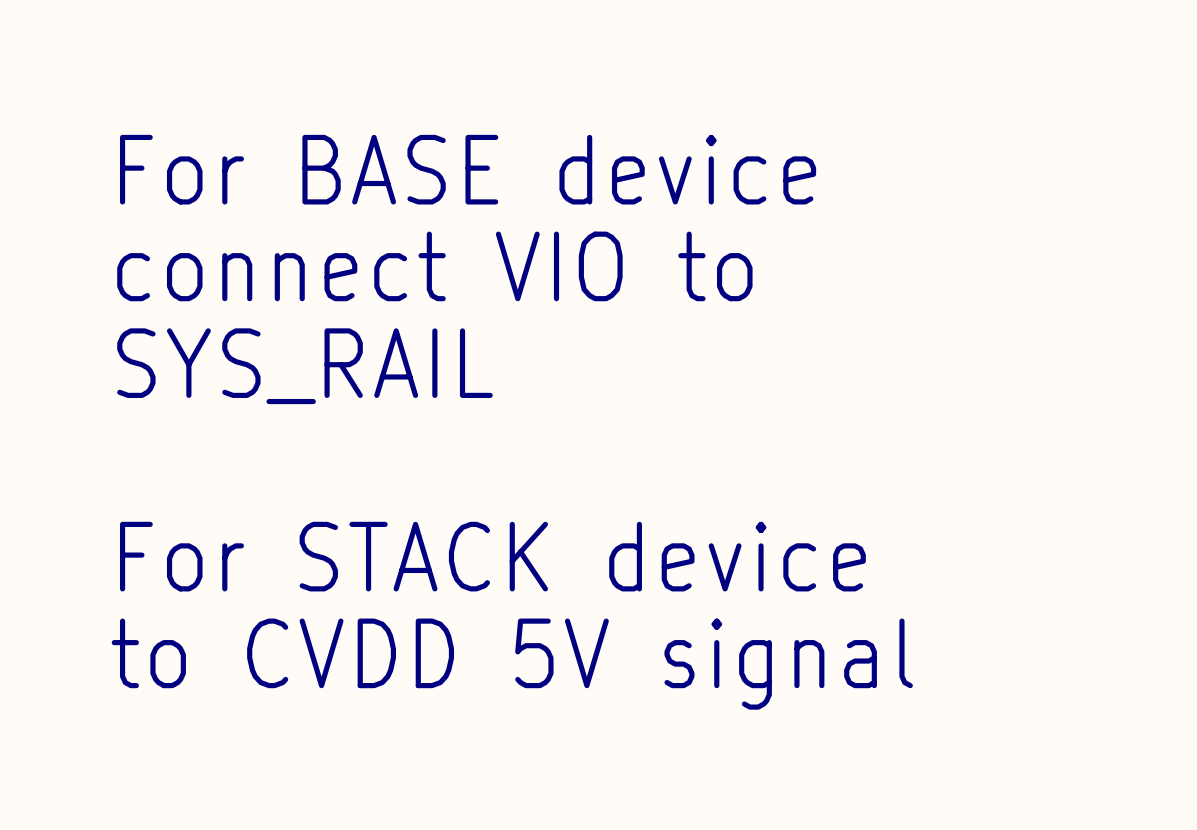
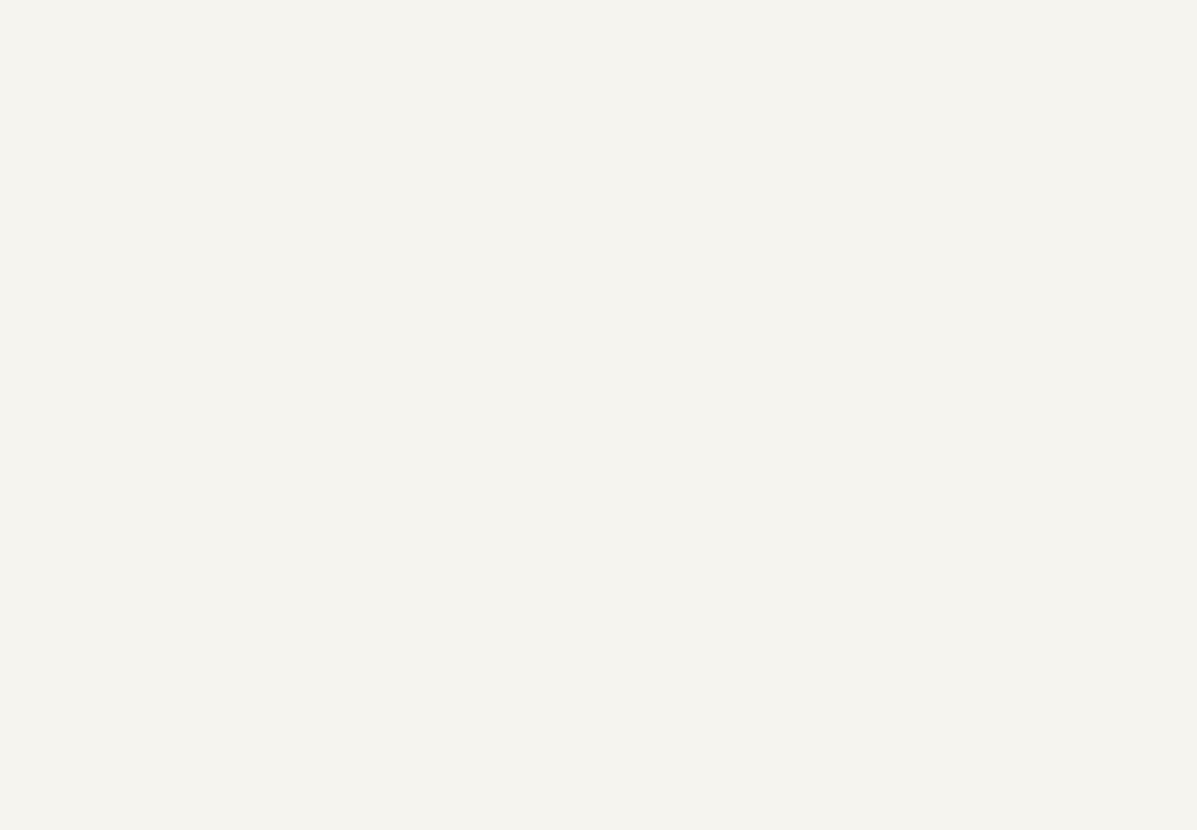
text: For BASE device (468, 169) -> none
text: connect VIO to (434, 266) -> none
text: SYS_RAIL (304, 366) -> none
text: For STACK device (492, 556) -> none
text: to CVDD 5V signal (512, 664) -> none

